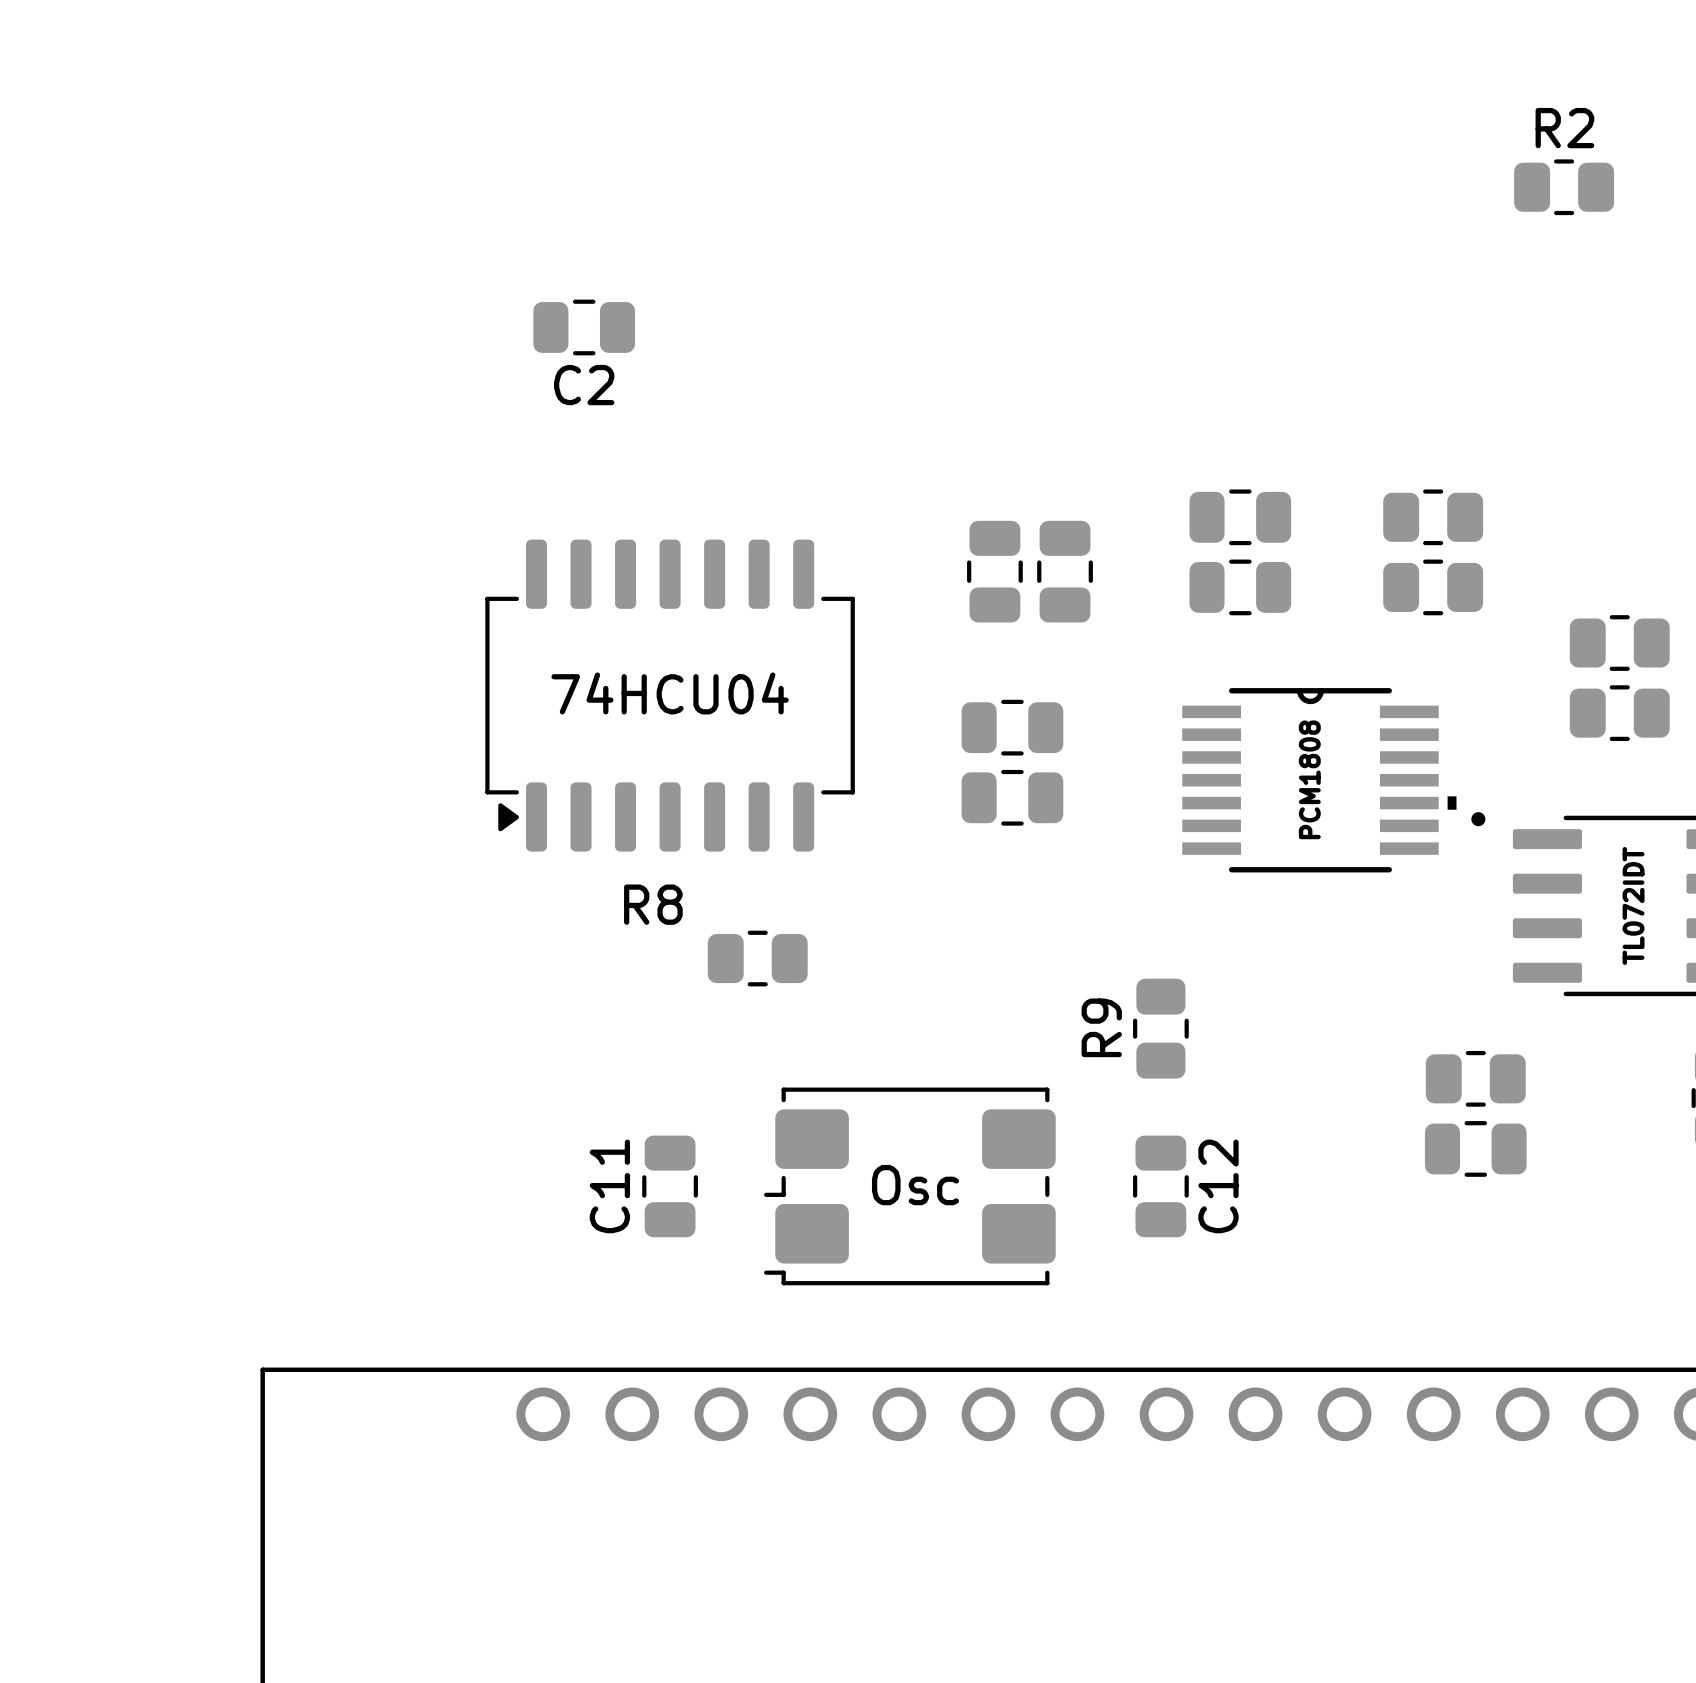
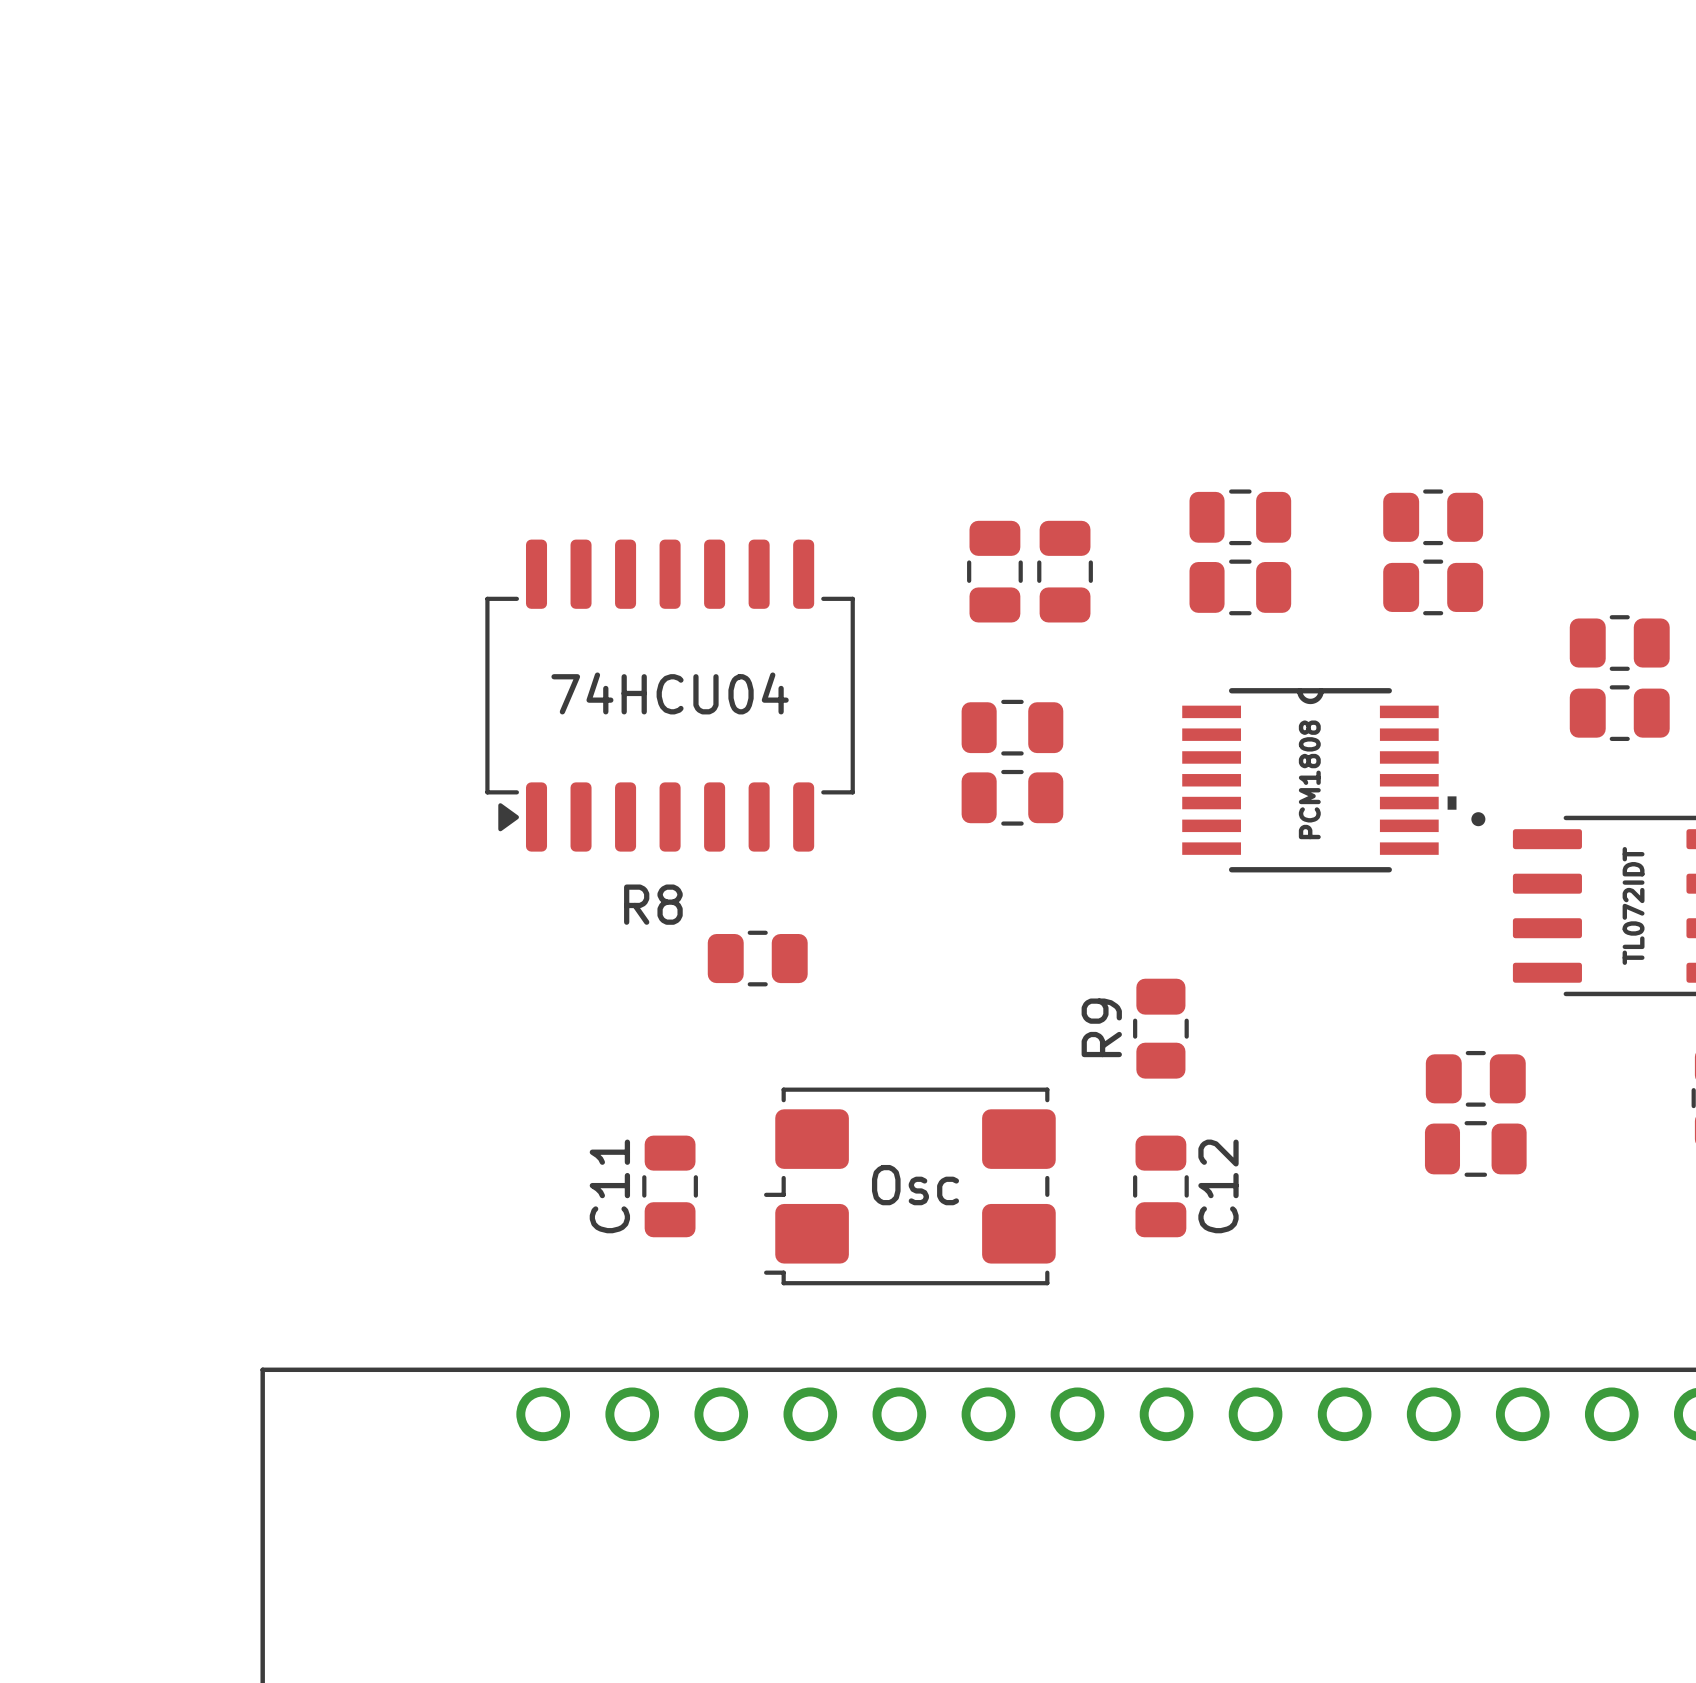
R2: (1564, 187) -> none
C2: (584, 327) -> none

